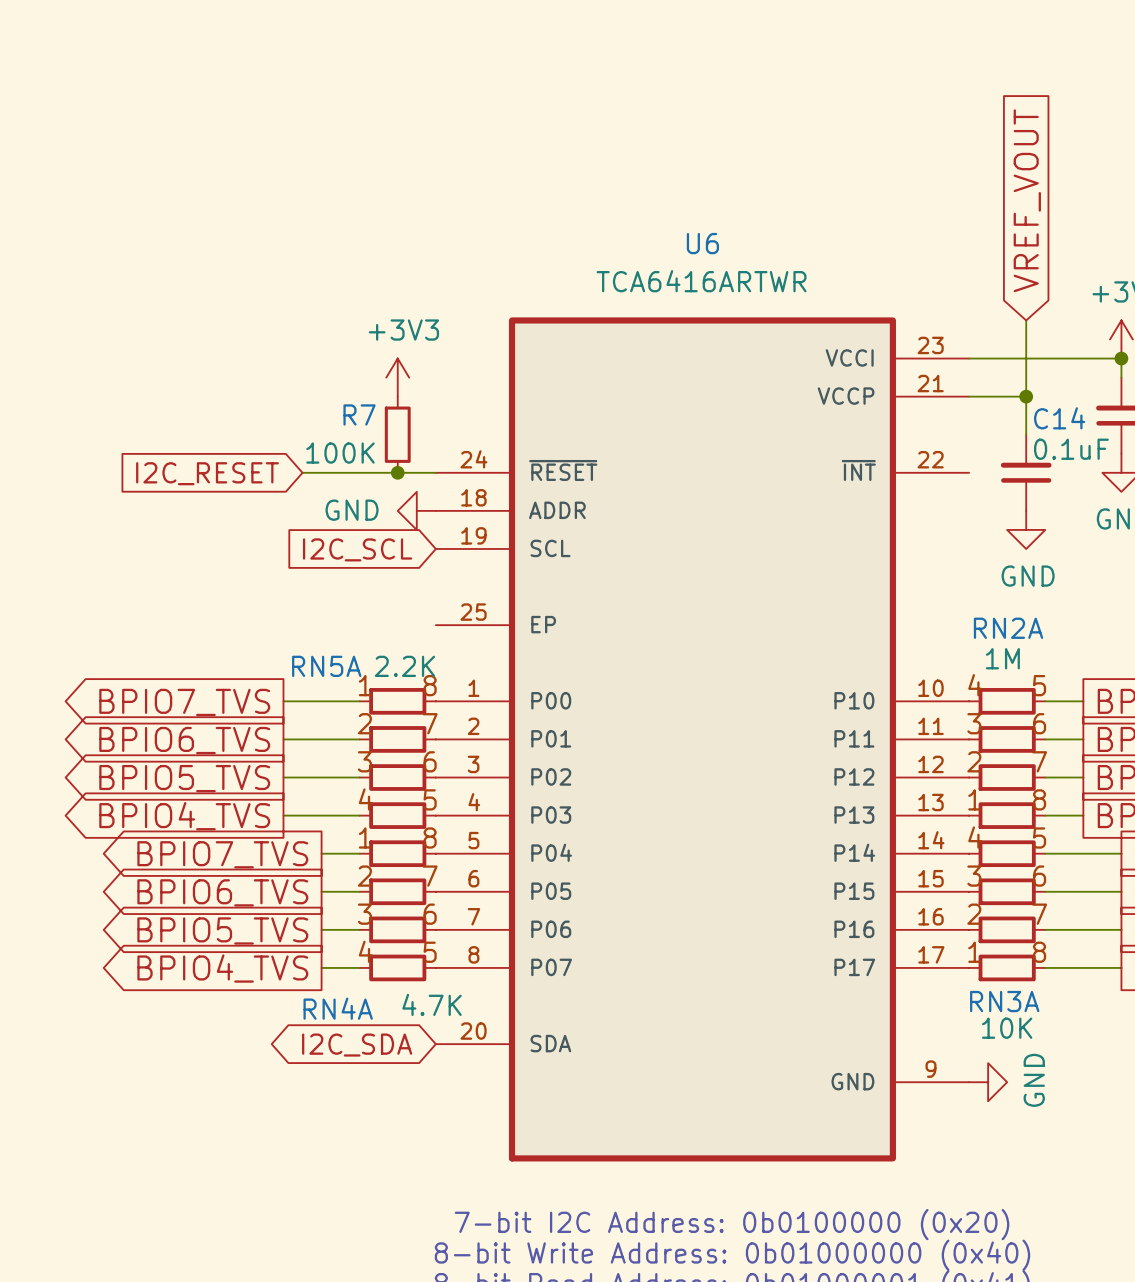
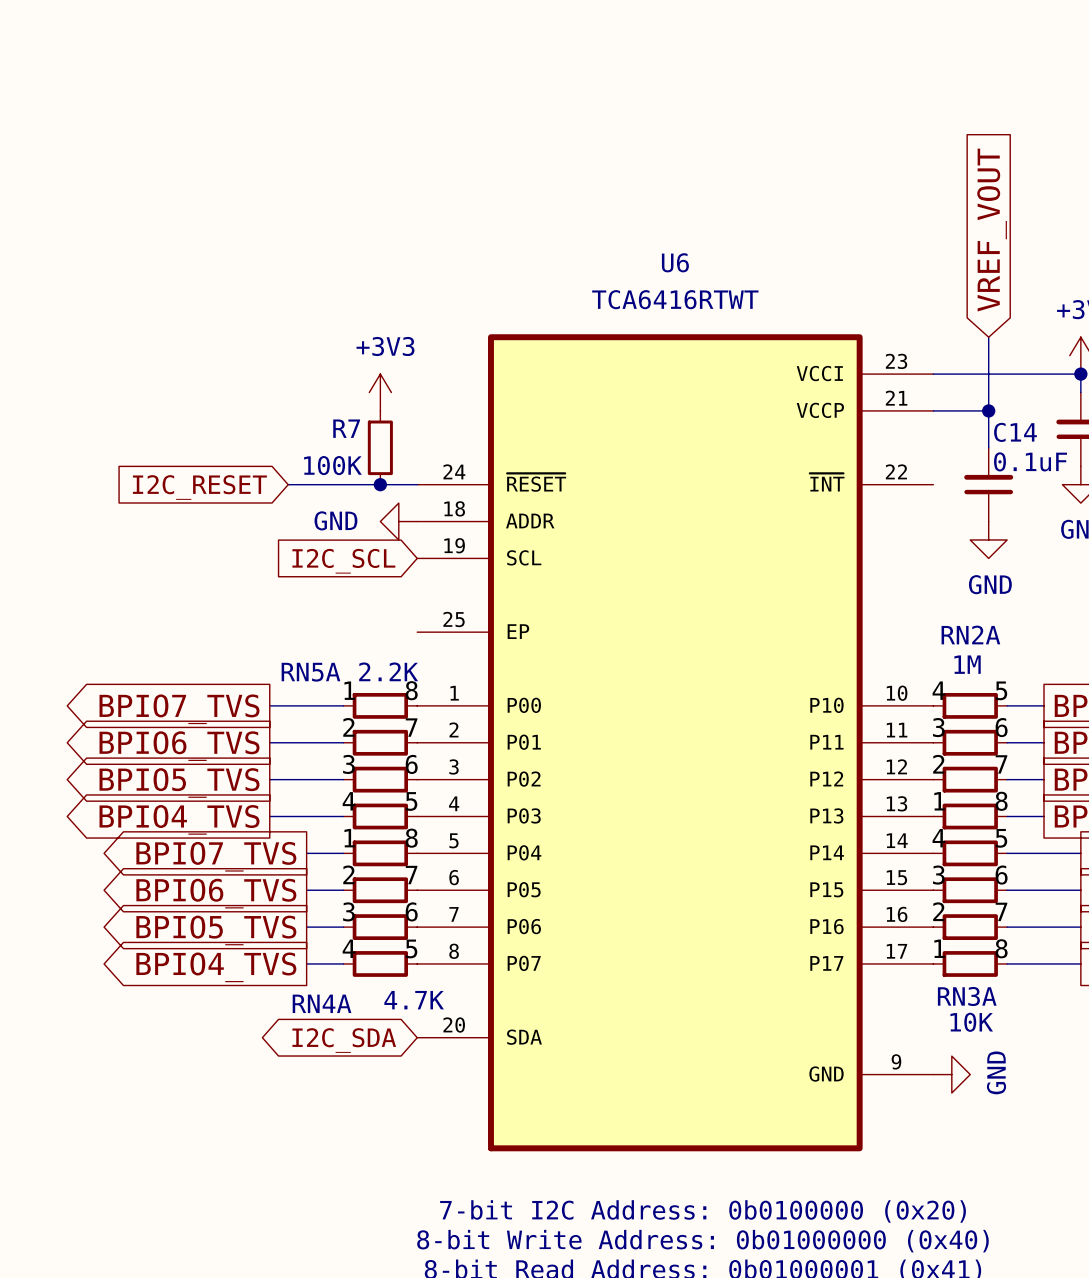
U6 value: TCA6416ARTWR (701, 281) -> TCA6416RTWT (675, 299)

